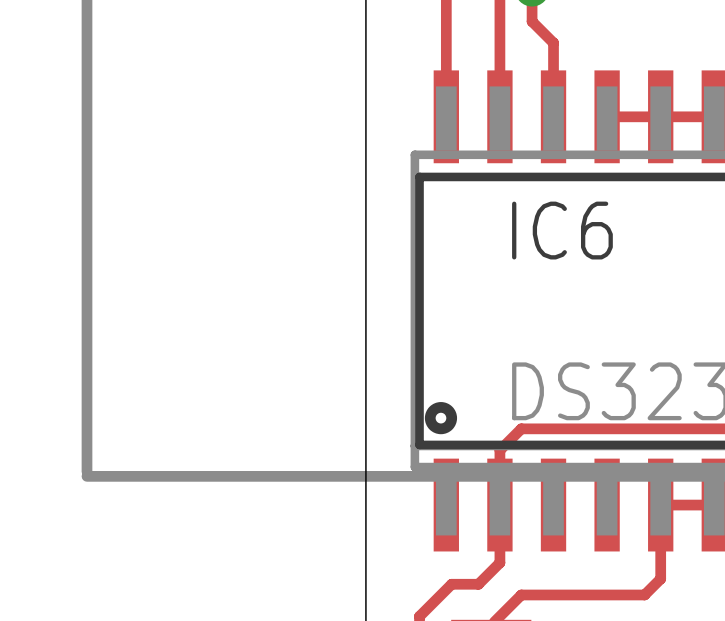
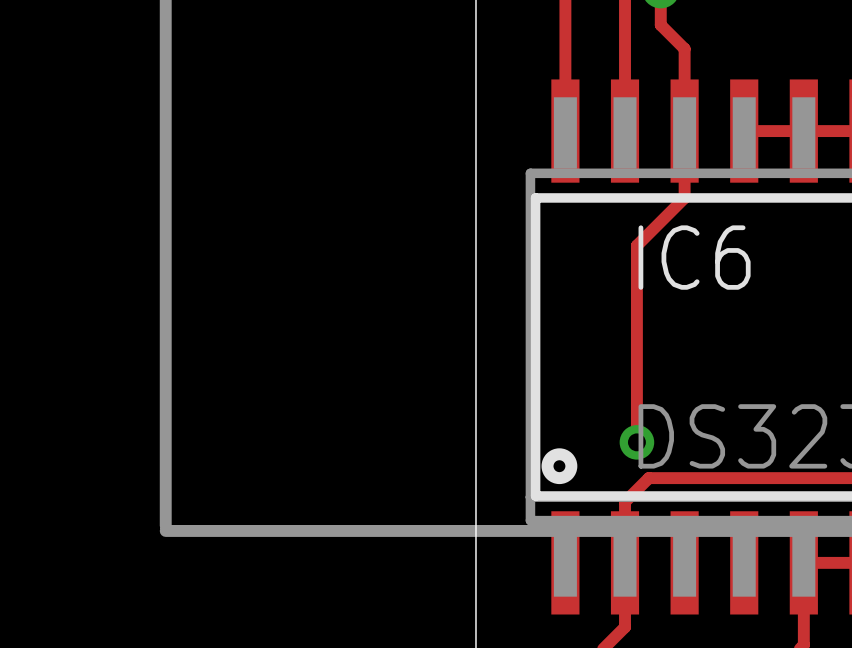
track: none -> (684, 131) (684, 197) (636, 245) (636, 442)
via: none -> (636, 442)

